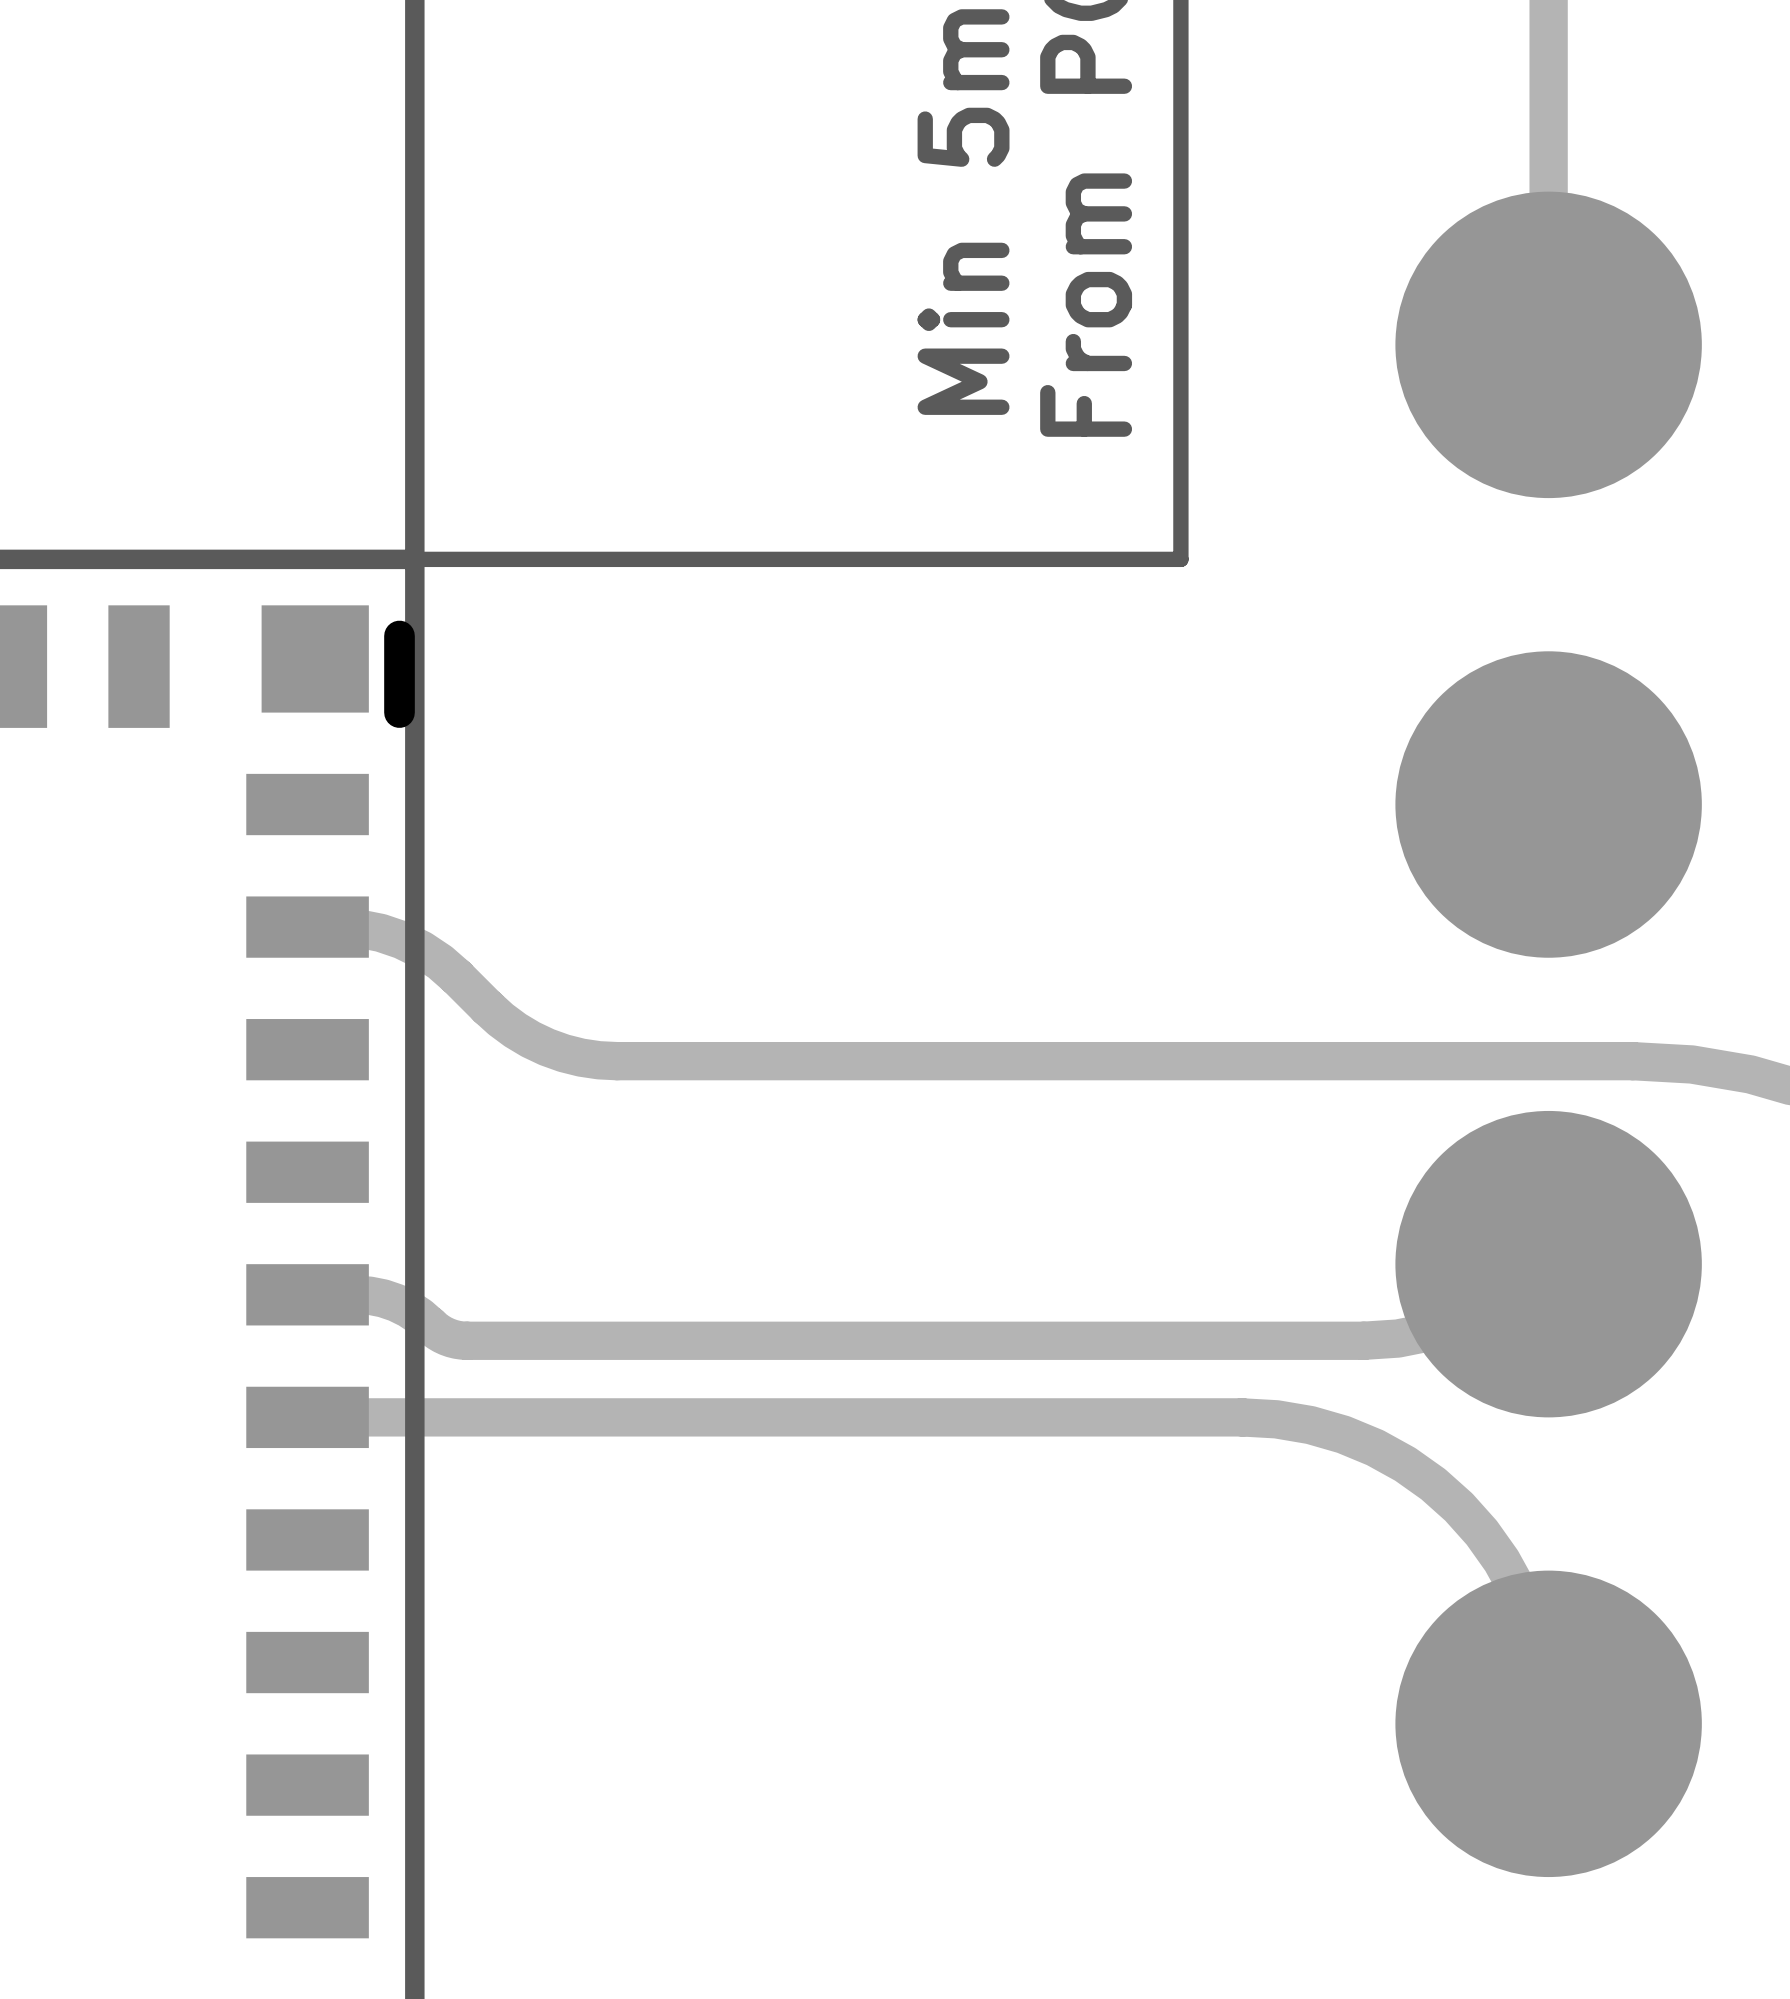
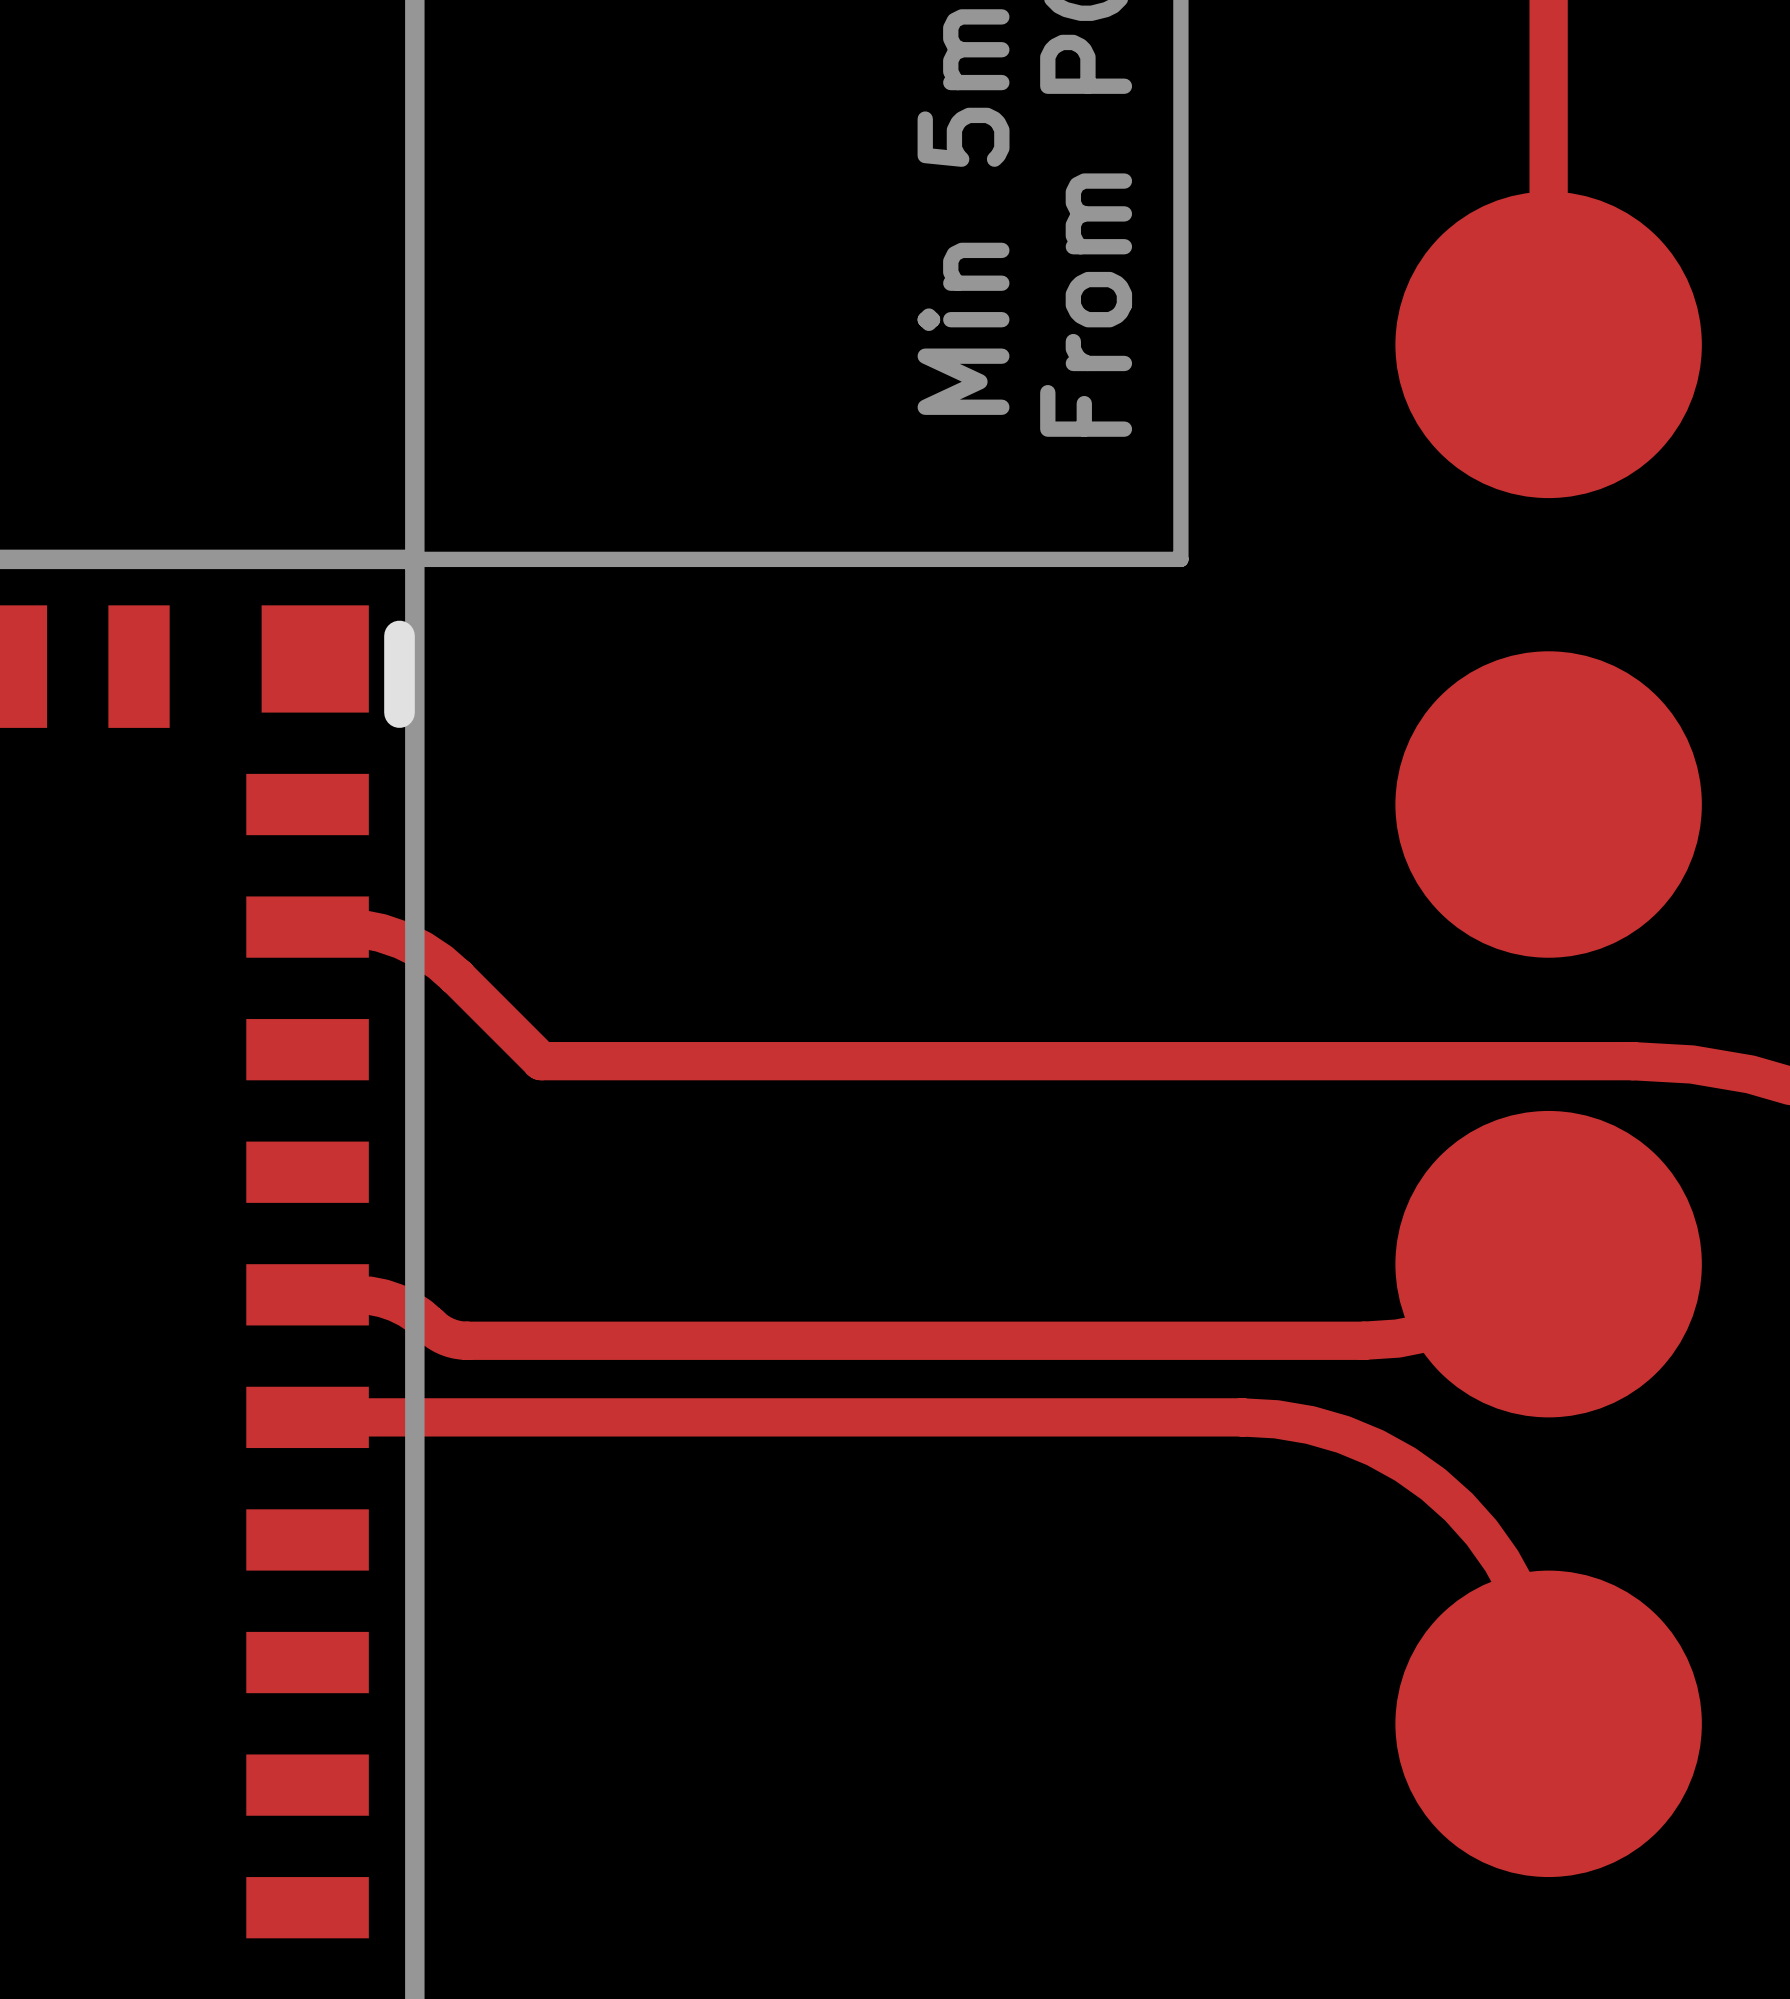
track: (487, 1007) (515, 1030) (547, 1047) (581, 1057) (617, 1061) -> (487, 1007) (541, 1061) (617, 1061)

